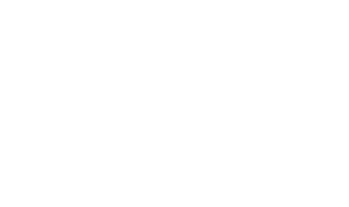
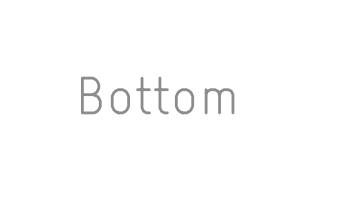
text: none -> Bottom (157, 95)

